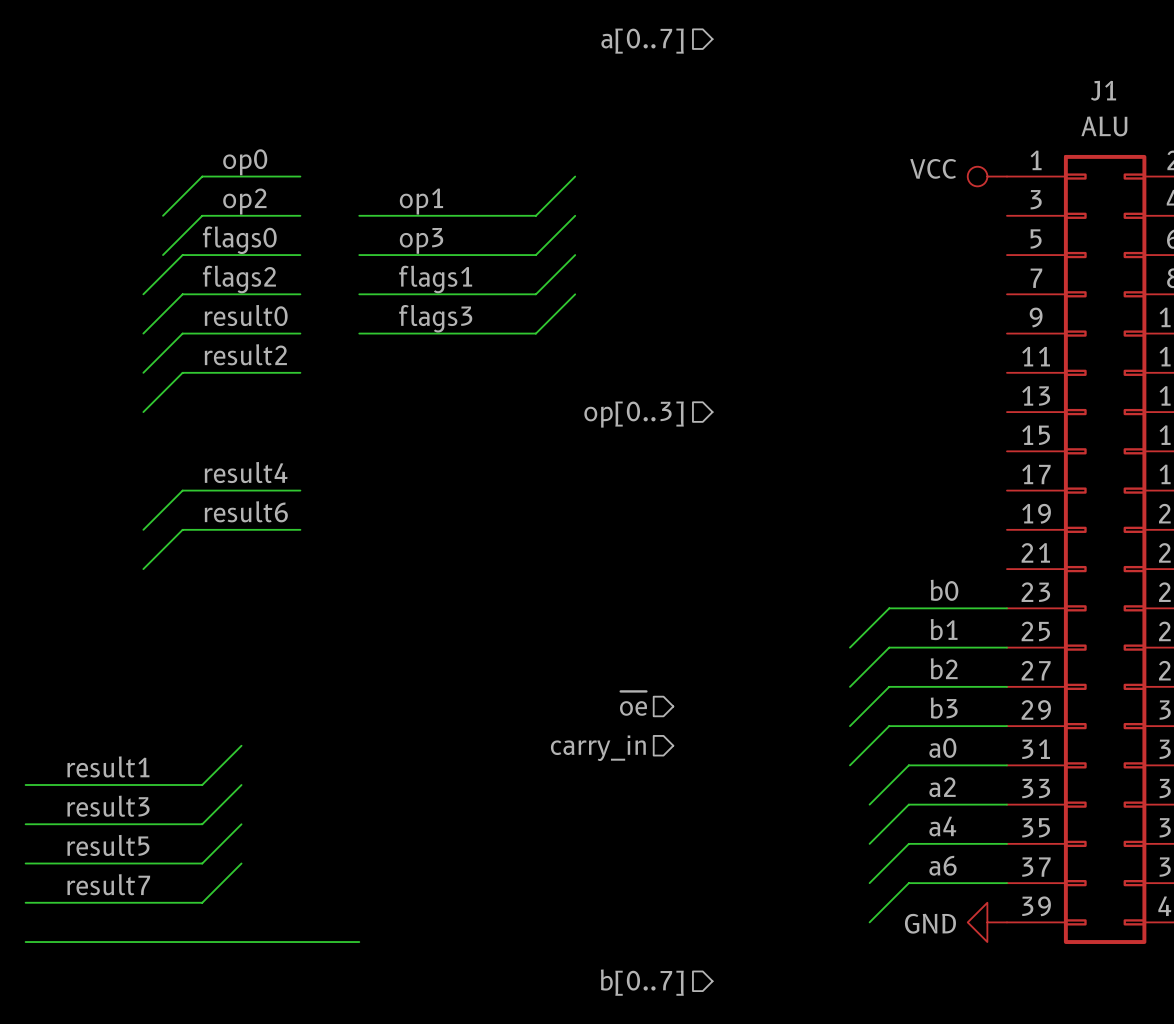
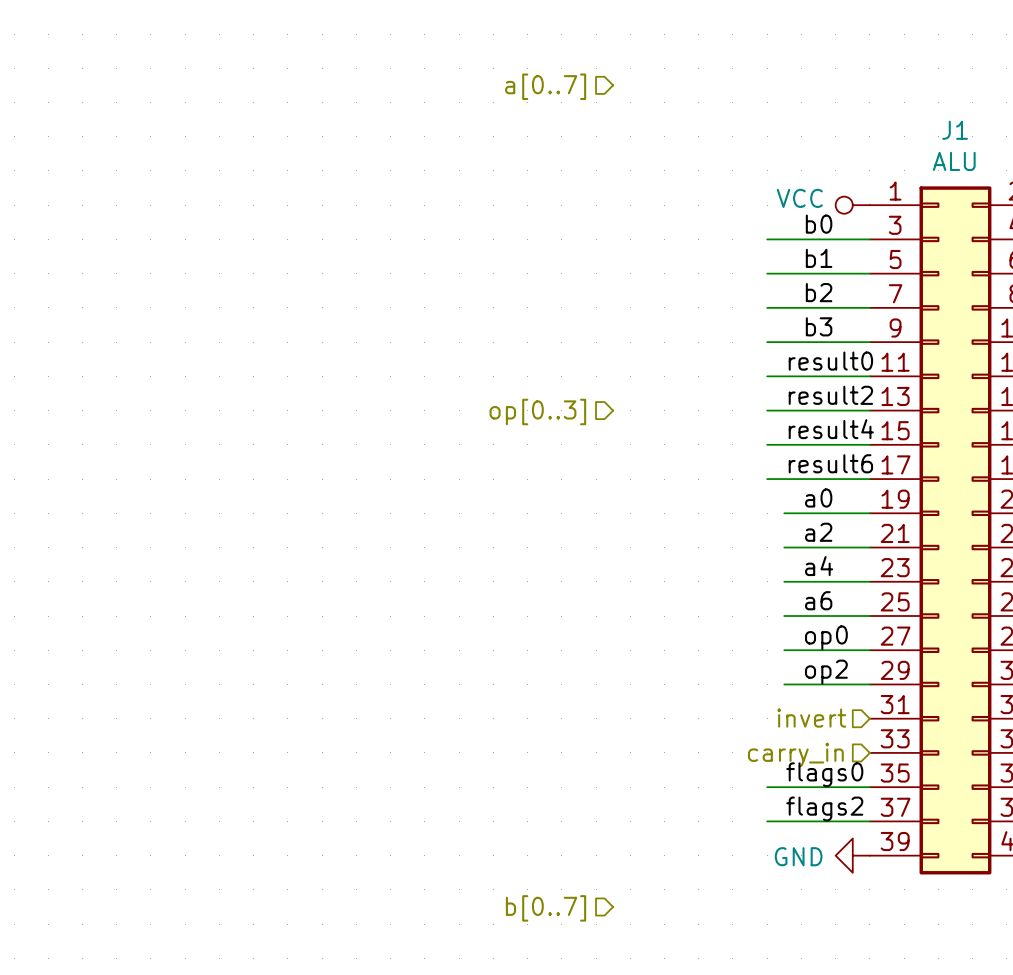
label: op0 (245, 162) -> none
wire: (300, 176) (202, 176) (163, 215) -> none
wire: (575, 176) (535, 215) (359, 215) -> none
label: none -> b0 (819, 224)
label: op2 (244, 201) -> none
label: op1 (421, 201) -> none
wire: (300, 215) (202, 215) (163, 255) -> none
wire: (575, 215) (535, 255) (359, 255) -> none
wire: none -> (767, 239) (869, 239)
label: none -> b1 (819, 258)
label: flags0 (239, 240) -> none
label: op3 (421, 240) -> none
wire: (300, 255) (182, 255) (143, 294) -> none
wire: (575, 255) (535, 294) (359, 294) -> none
wire: none -> (767, 273) (869, 273)
label: none -> b2 (819, 292)
label: flags2 (239, 279) -> none
label: flags1 (435, 279) -> none
wire: (300, 294) (182, 294) (143, 333) -> none
wire: (575, 294) (535, 333) (359, 333) -> none
wire: none -> (767, 307) (869, 307)
label: result0 (246, 315) -> none
label: none -> b3 (819, 326)
label: flags3 (435, 318) -> none
wire: (300, 333) (182, 333) (143, 372) -> none
wire: none -> (767, 342) (869, 342)
label: result2 (245, 354) -> none
label: none -> result0 (830, 361)
wire: (300, 372) (182, 372) (143, 412) -> none
wire: none -> (767, 376) (869, 376)
label: none -> result2 (830, 395)
wire: none -> (767, 410) (869, 410)
label: none -> result4 (831, 429)
wire: none -> (767, 444) (869, 444)
label: result4 (246, 472) -> none
label: none -> result6 (830, 463)
wire: (300, 490) (182, 490) (143, 529) -> none
wire: none -> (767, 479) (869, 479)
label: result6 (246, 511) -> none
wire: (300, 529) (182, 529) (143, 569) -> none
wire: none -> (784, 513) (869, 513)
wire: none -> (784, 547) (869, 547)
label: b0 (944, 590) -> a4 (819, 566)
wire: (908, 608) (889, 608) (849, 647) -> none
label: b1 (944, 629) -> a6 (818, 600)
wire: (908, 647) (889, 647) (849, 686) -> none
label: b2 (944, 668) -> op0 (826, 637)
wire: (908, 686) (889, 686) (849, 726) -> none
hierarchical label: ~{oe} (633, 703) -> none
label: b3 (944, 708) -> op2 (826, 672)
wire: (908, 726) (889, 726) (849, 765) -> none
wire: (241, 745) (202, 785) (25, 785) -> none
label position: a0 (942, 747) -> a0 (818, 498)
hierarchical label position: carry_in (598, 748) -> carry_in (795, 755)
hierarchical label: none -> invert (811, 718)
wire: (1007, 765) (908, 765) (869, 804) -> none
label: result1 (108, 766) -> none
wire: (241, 785) (202, 824) (25, 824) -> none
label position: a2 (942, 787) -> a2 (818, 532)
wire: (1007, 804) (908, 804) (869, 843) -> none
label: result3 (108, 806) -> none
wire: (241, 824) (202, 863) (25, 863) -> none
label: a4 (942, 826) -> none
label: none -> flags0 (824, 774)
wire: (908, 843) (869, 883) -> (784, 787) (767, 787)
label: result5 (108, 845) -> none
wire: (241, 863) (202, 902) (25, 902) -> none
label: a6 (942, 865) -> none
label: none -> flags2 (824, 808)
wire: (908, 883) (869, 922) -> (784, 821) (767, 821)
label: result7 (108, 884) -> none
wire: (25, 942) (359, 942) -> none

